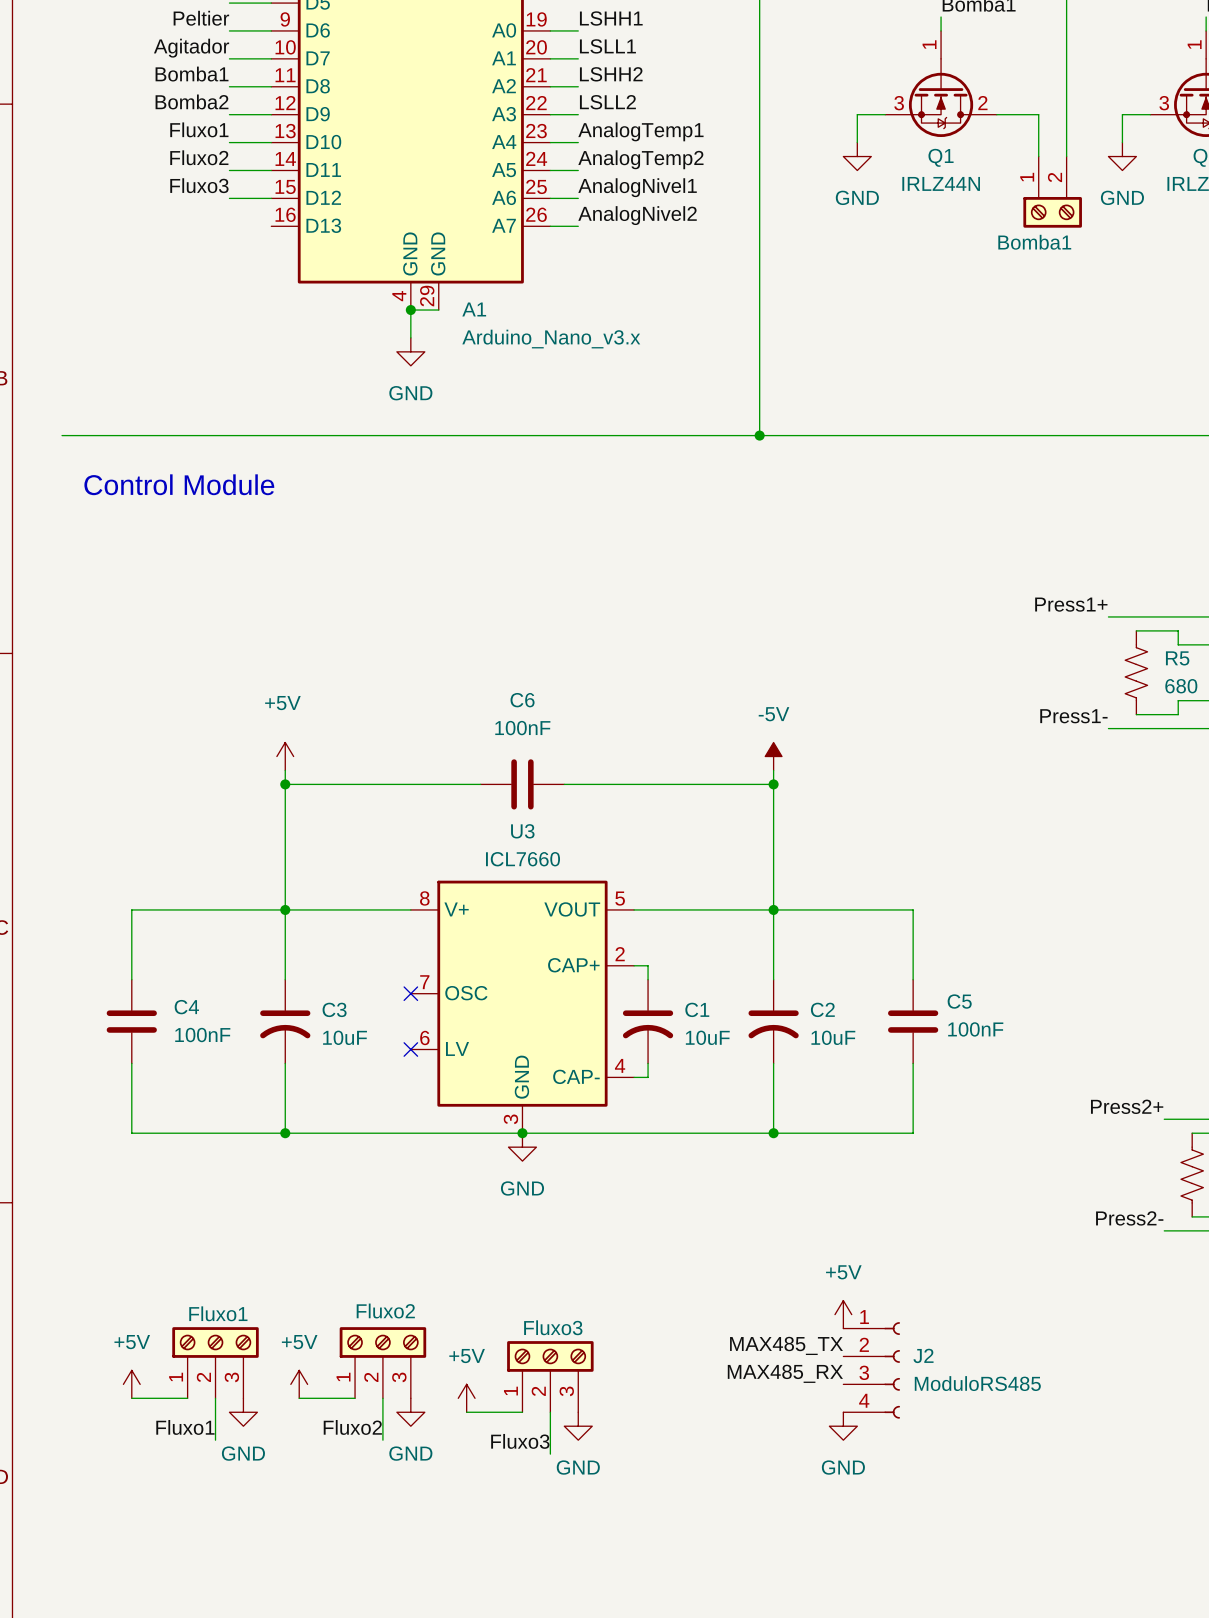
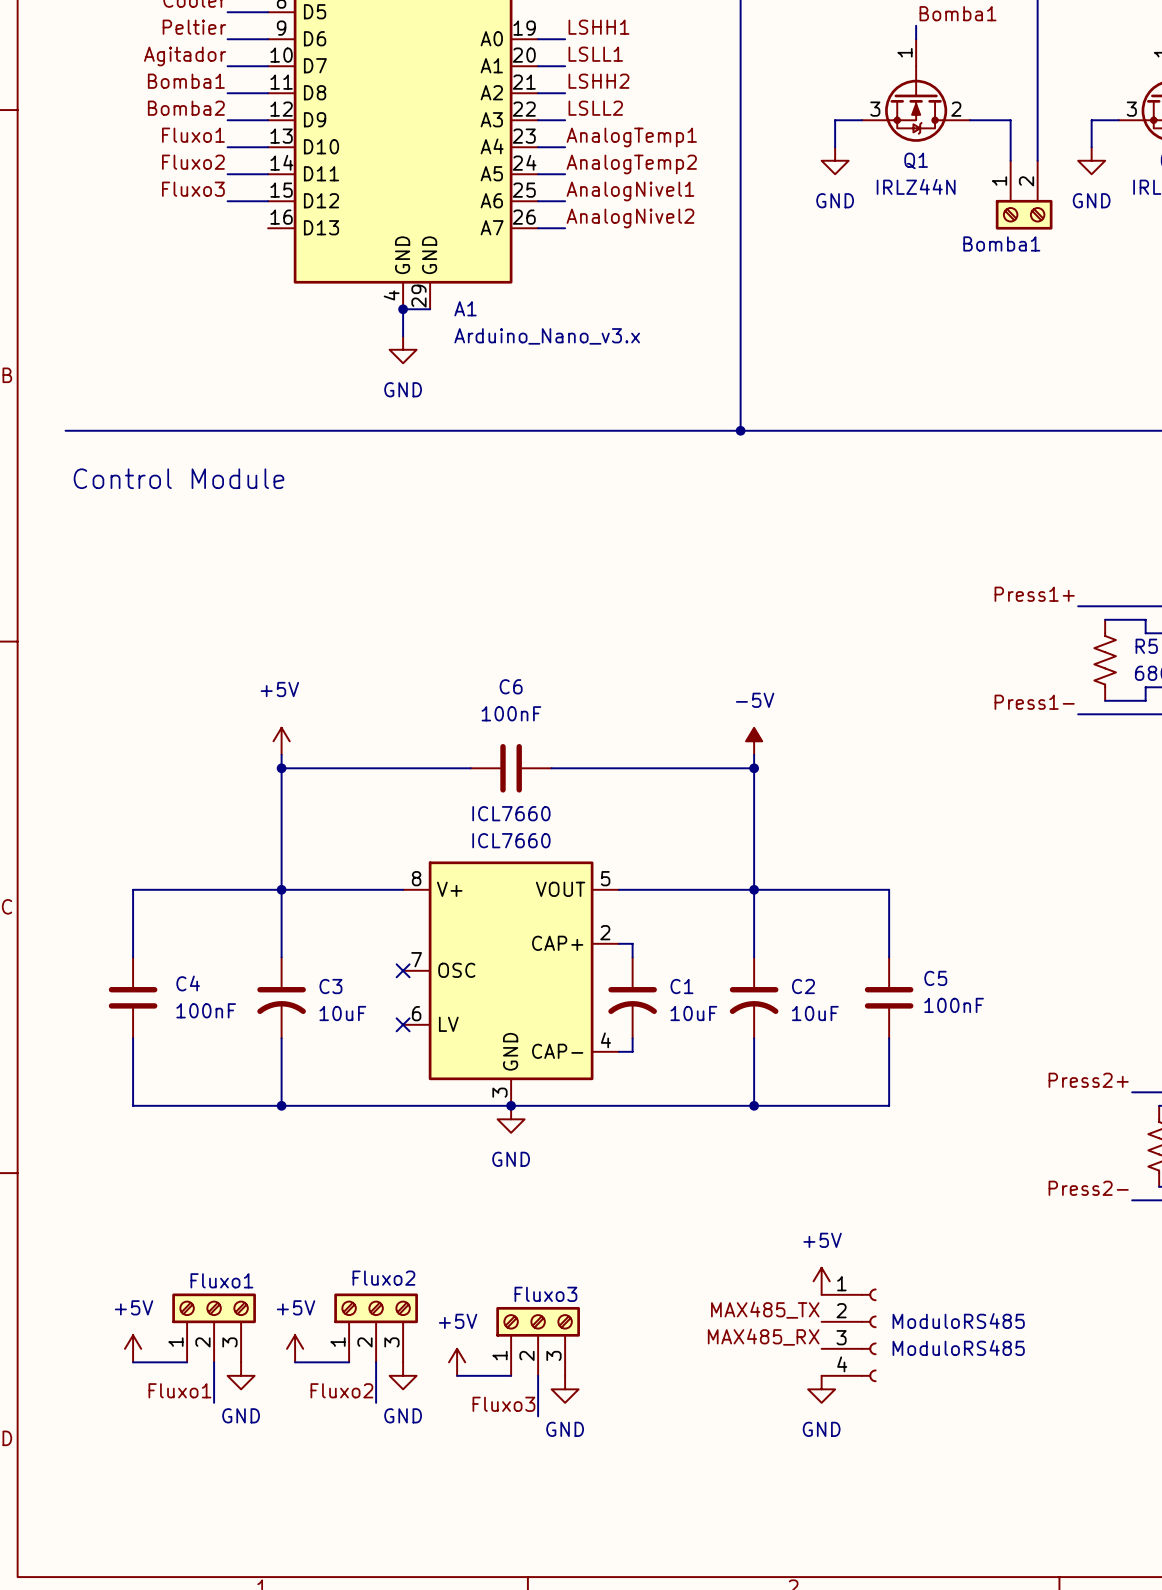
U3 name: U3 (522, 831) -> ICL7660 (511, 813)
J2 name: J2 (923, 1355) -> ModuloRS485 (958, 1321)

